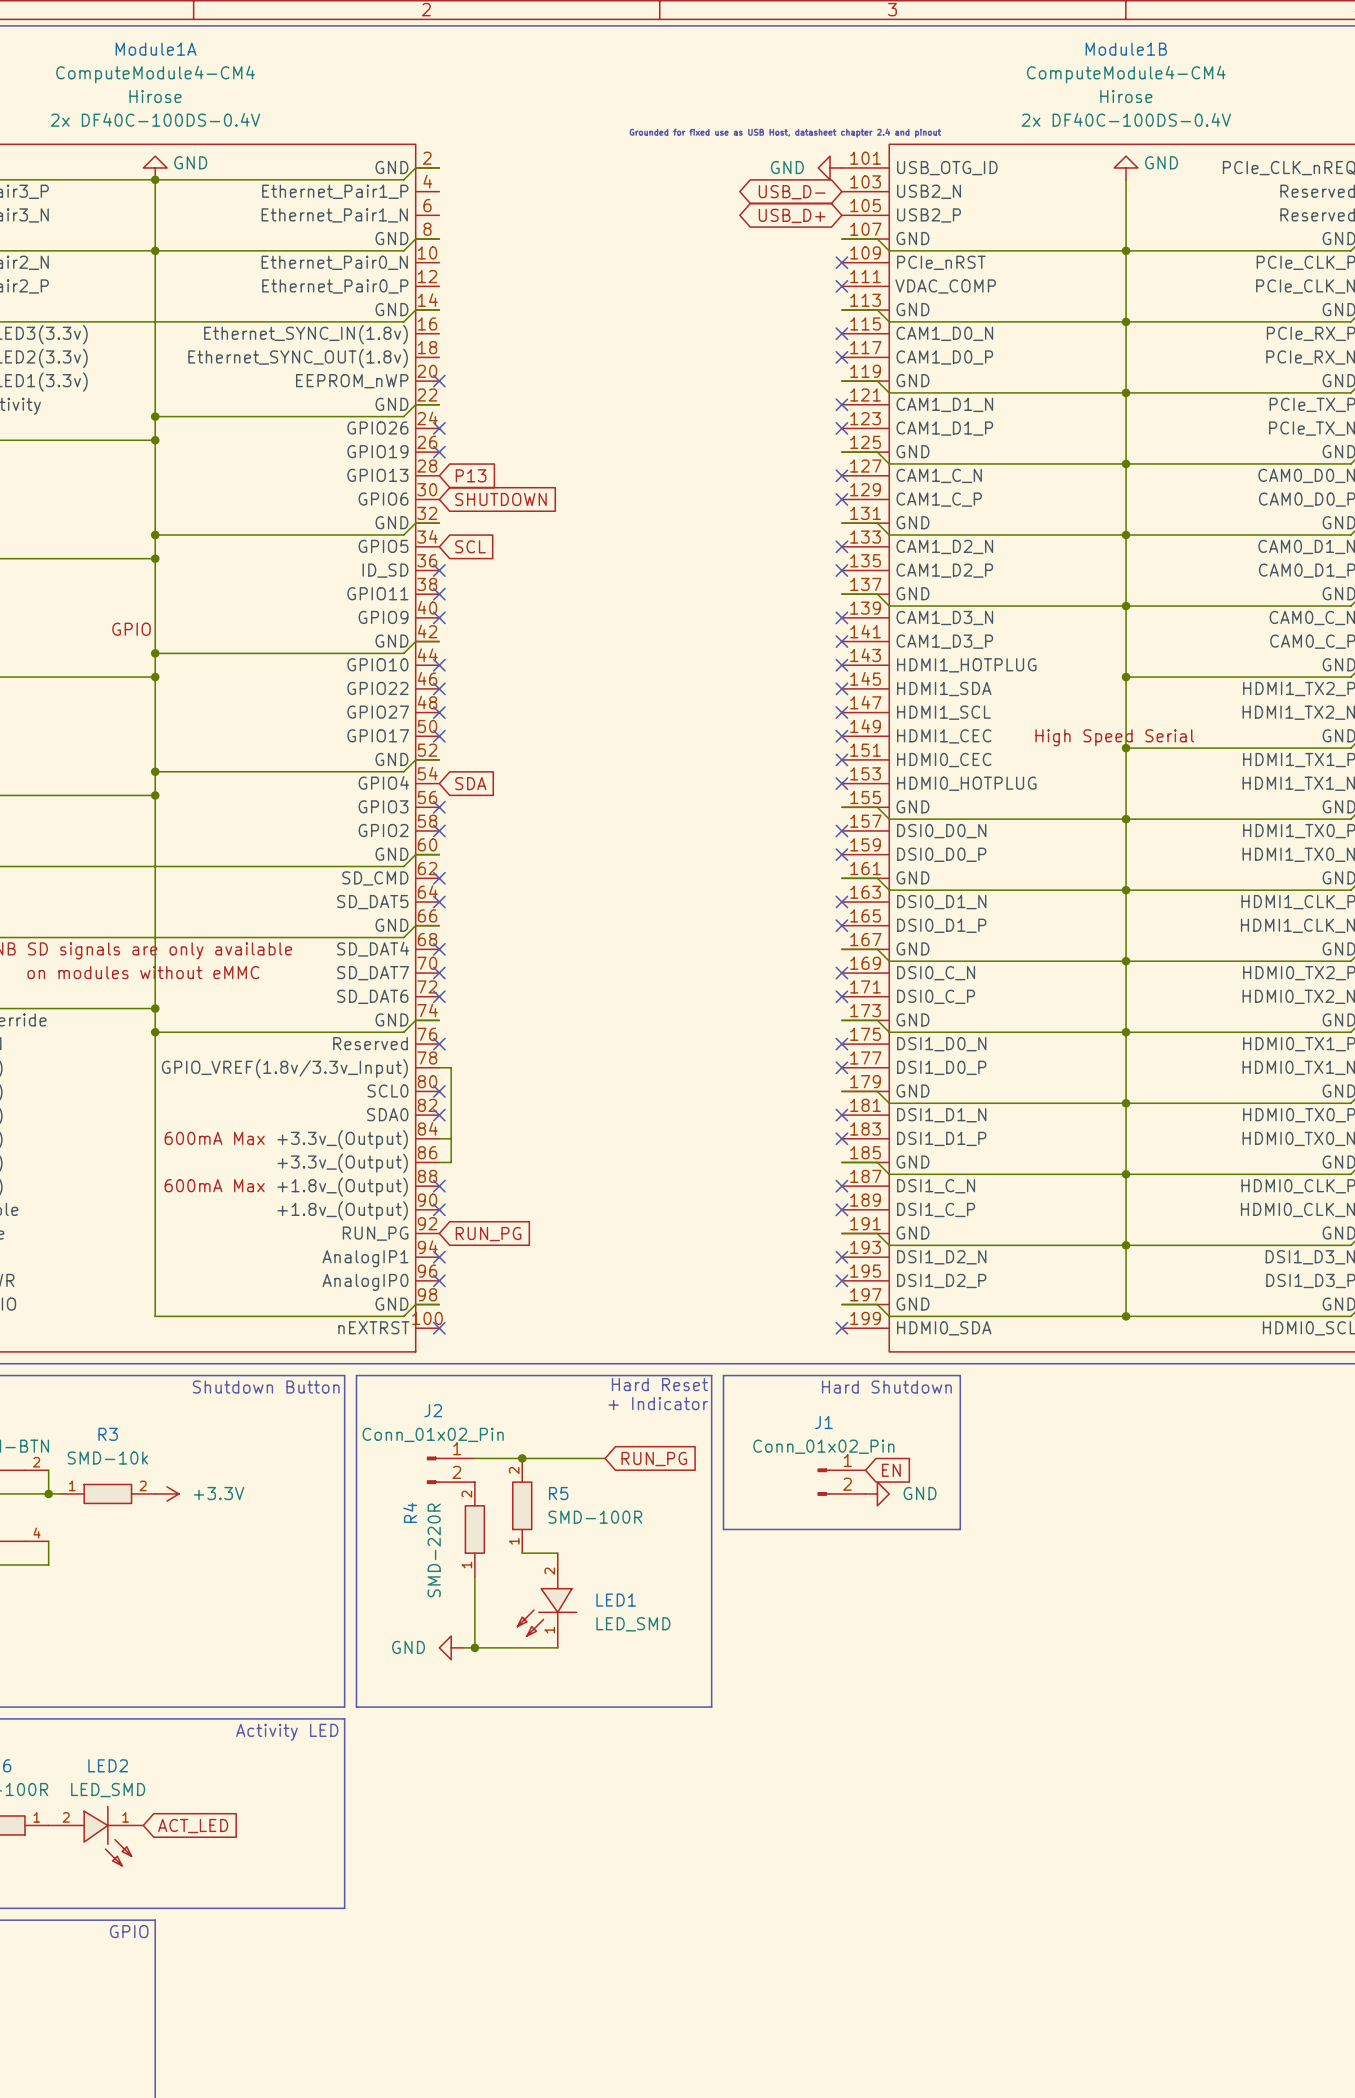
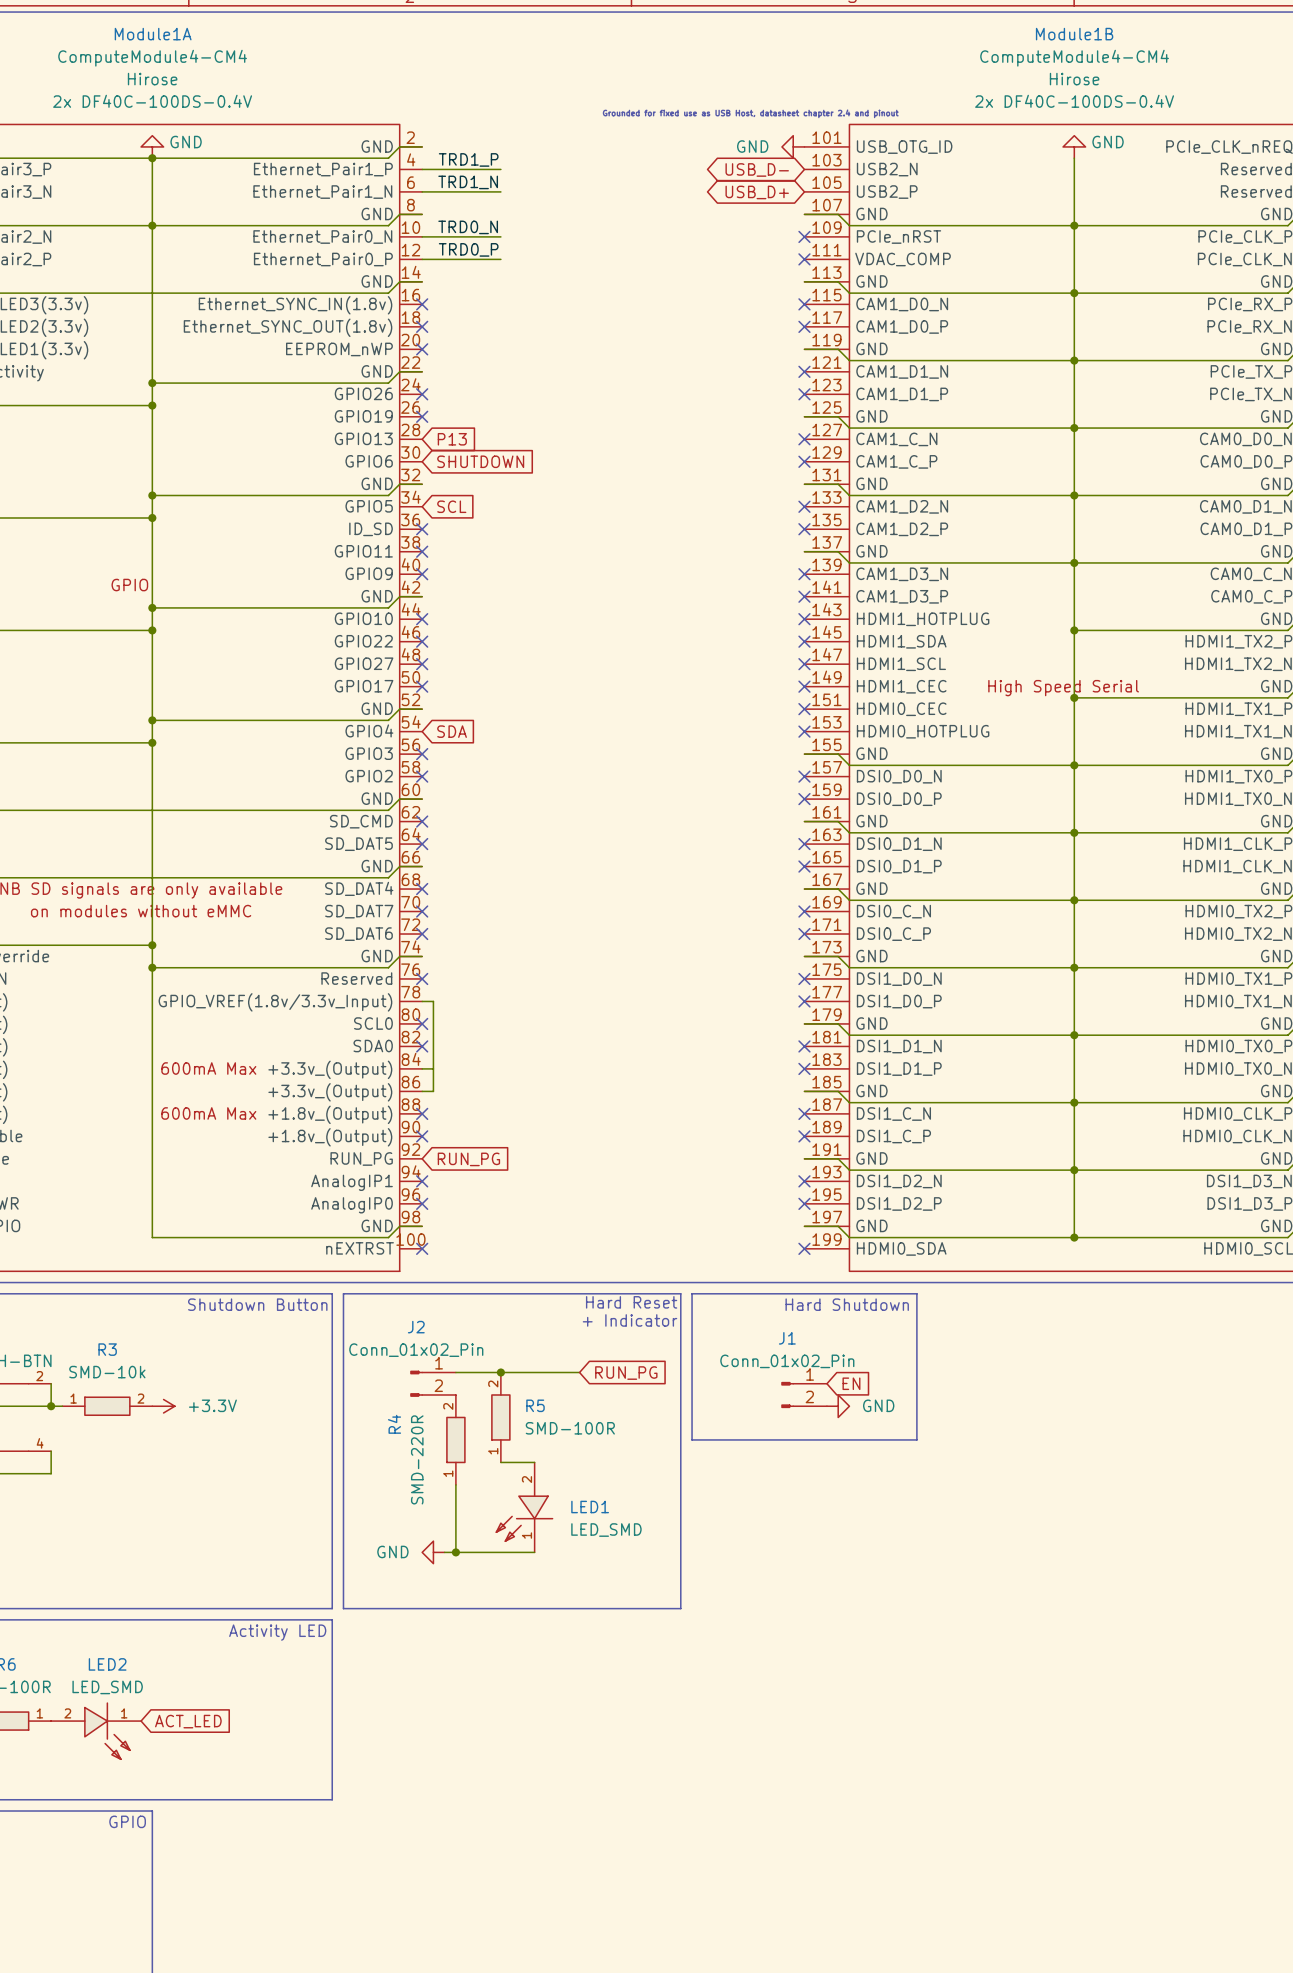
label: none -> TRD1_P (468, 159)
wire: none -> (422, 169) (500, 169)
label: none -> TRD1_N (468, 182)
wire: none -> (422, 191) (500, 191)
label: none -> TRD0_N (468, 227)
wire: none -> (422, 236) (500, 236)
label: none -> TRD0_P (468, 249)
wire: none -> (422, 259) (500, 259)
no-connect mark: none -> (422, 304)
no-connect mark: none -> (422, 326)

